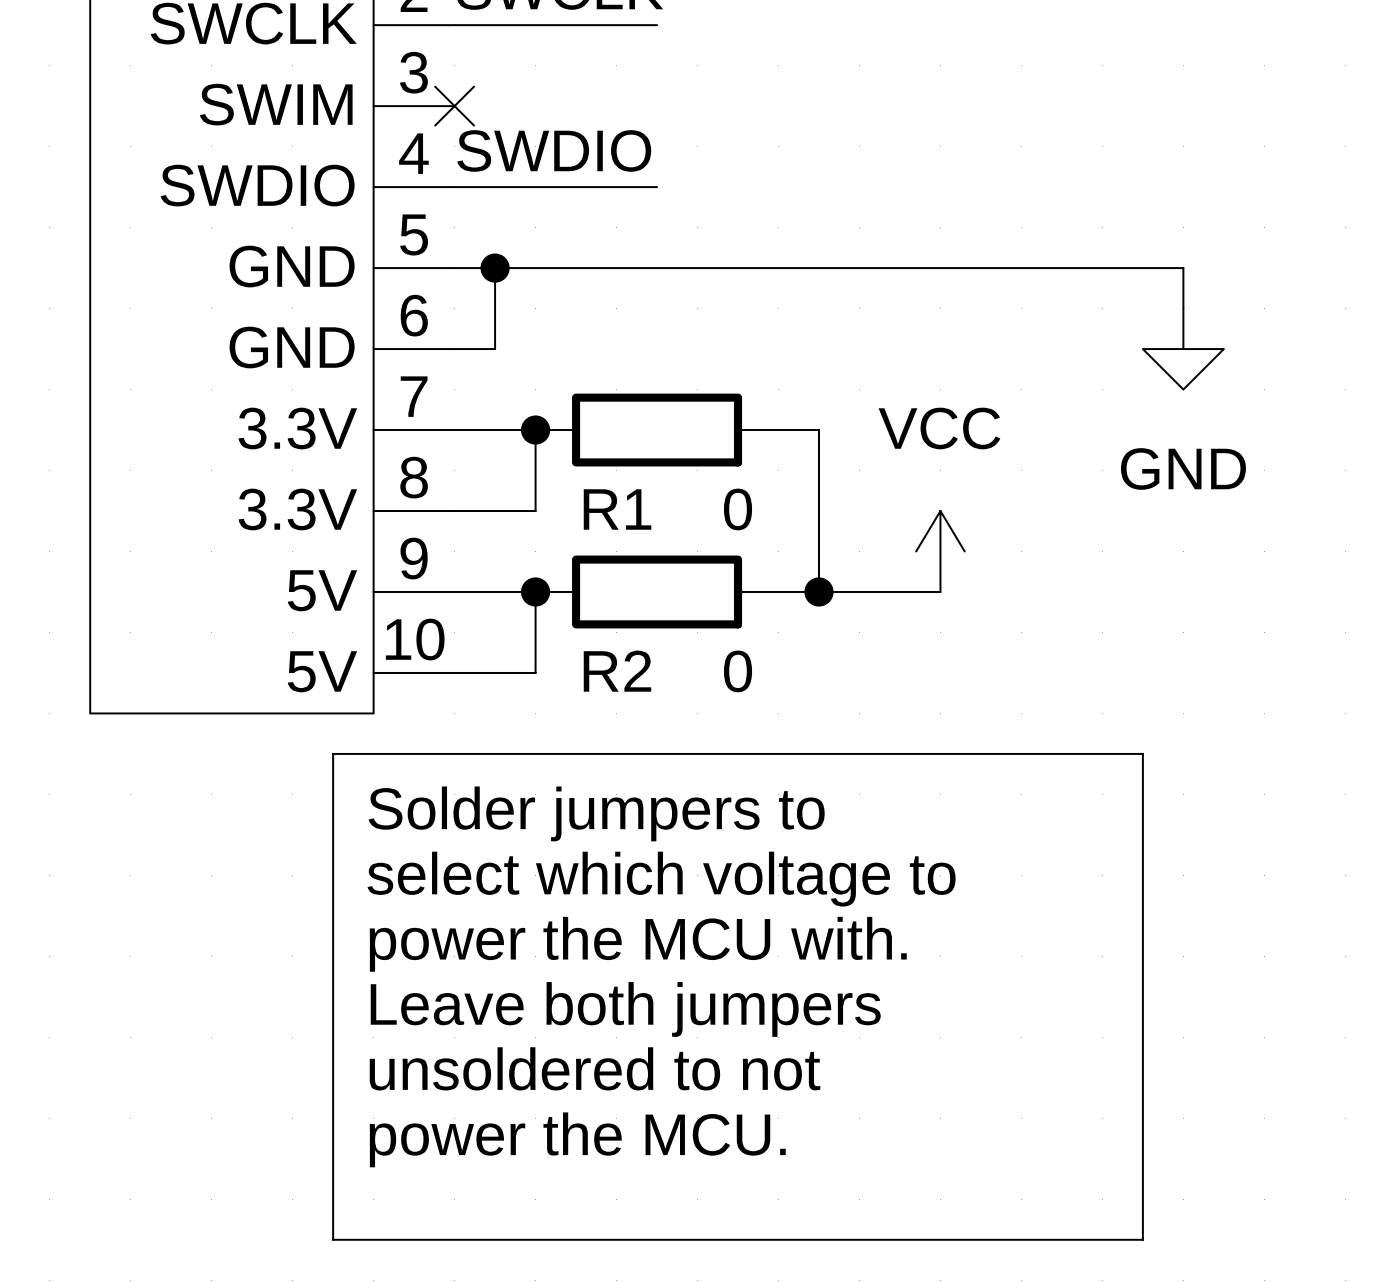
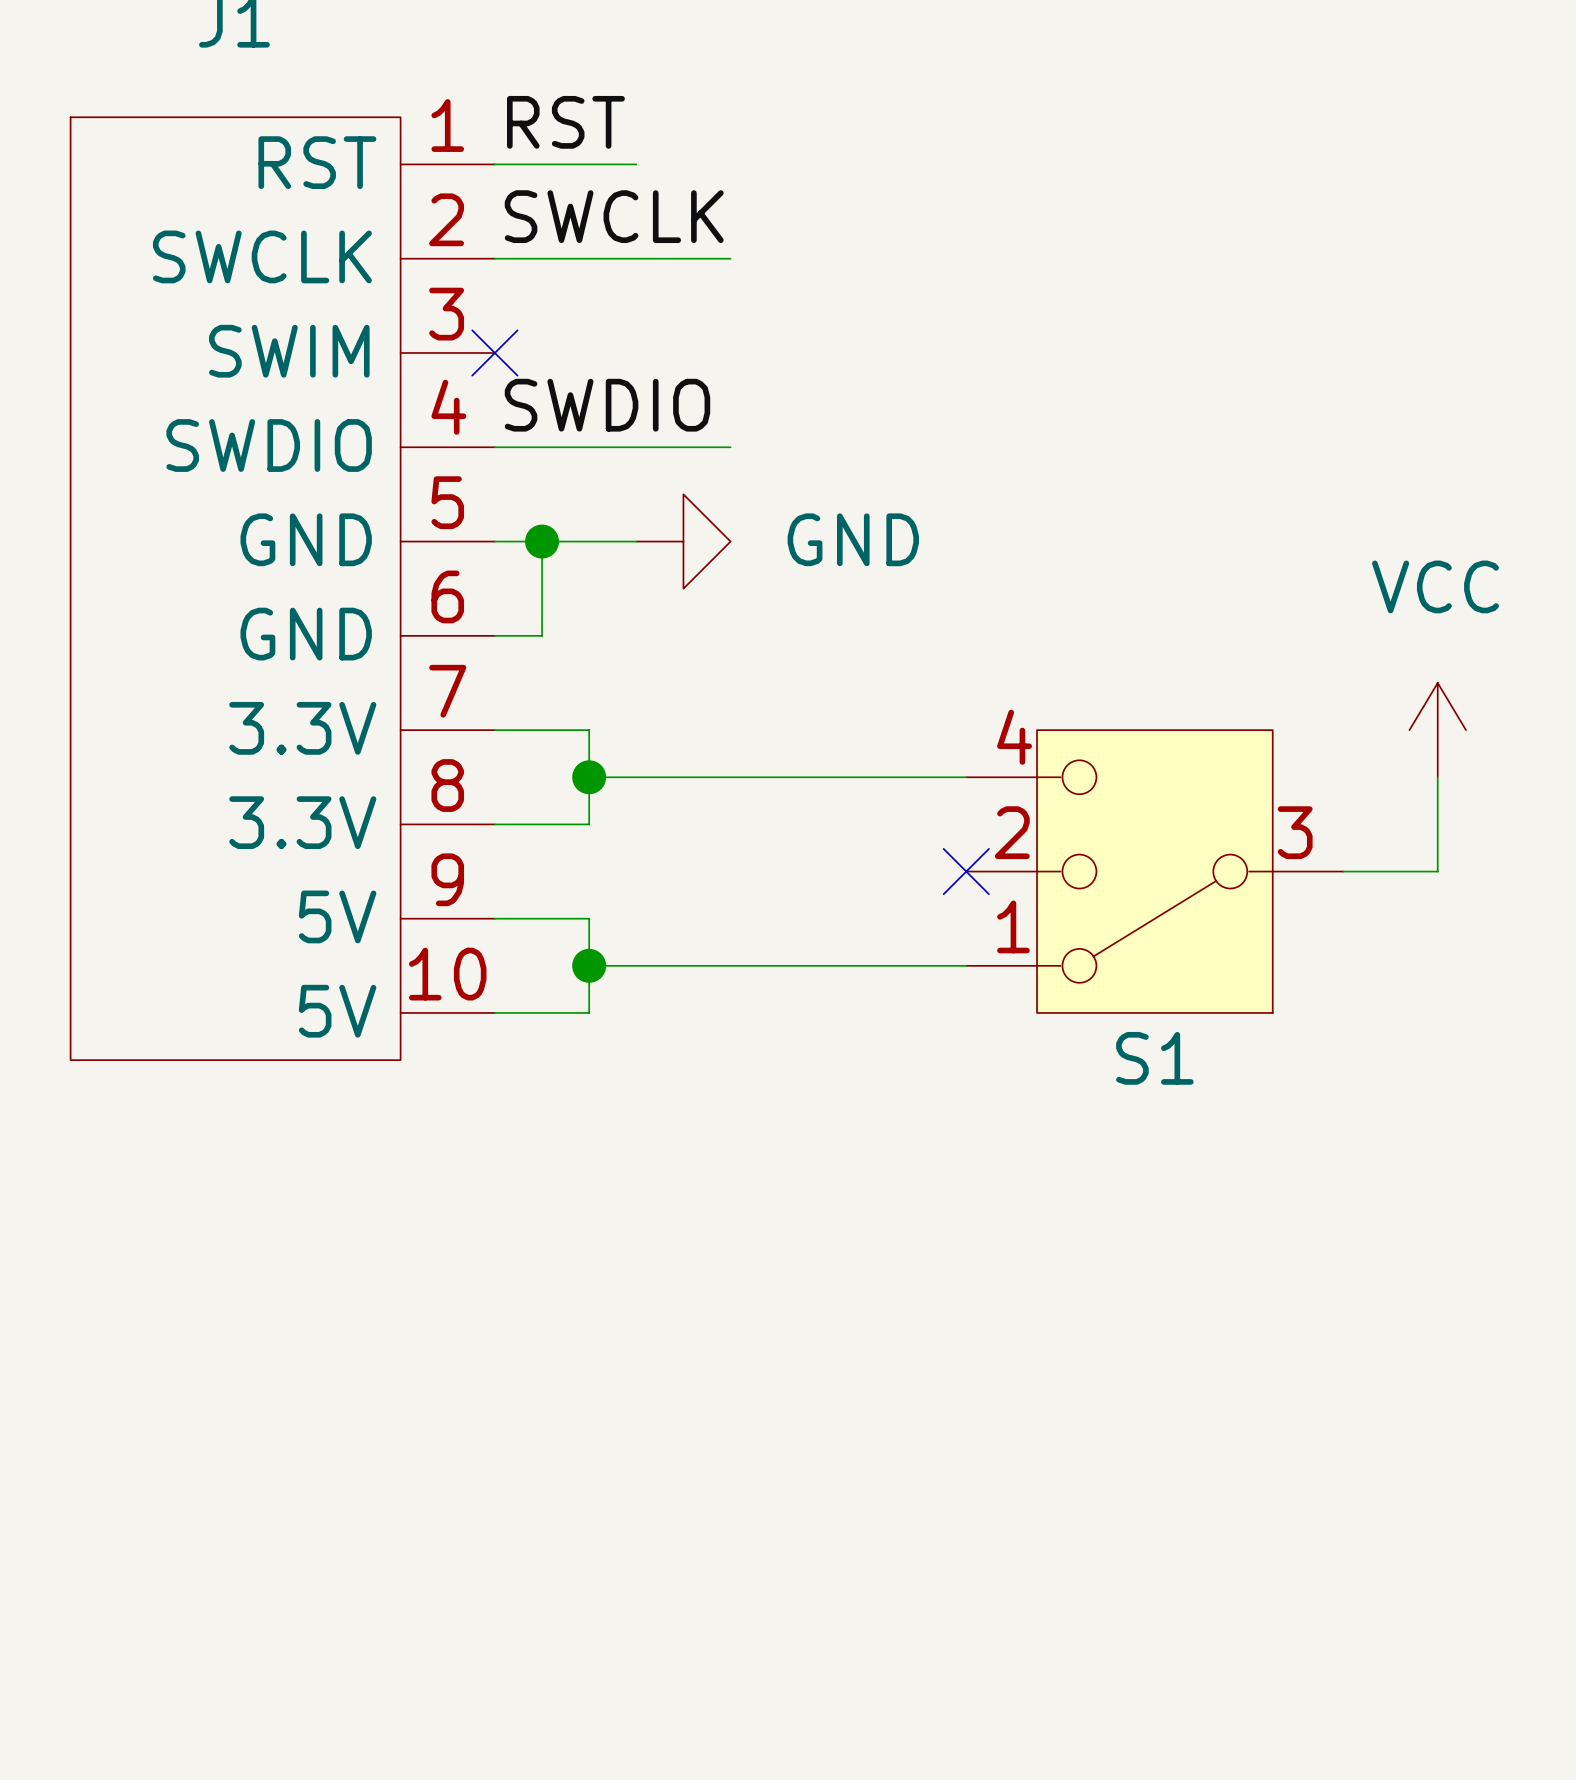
wire: (576, 268) (1183, 268) (1183, 308) -> none
power symbol rotation: 0° (1183, 349) -> 90° counterclockwise (683, 541)
power symbol position: GND (1183, 349) -> GND (683, 541)
junction position: (535, 430) -> (589, 777)
R1: 0 (657, 430) -> none
wire: (778, 430) (818, 430) (818, 591) -> none
wire: none -> (589, 777) (966, 777)
wire: none -> (1437, 777) (1437, 871) (1343, 871)
no-connect mark: none -> (966, 871)
power symbol position: VCC (940, 551) -> VCC (1437, 730)
S1: none -> (1154, 871)
junction position: (535, 591) -> (589, 965)
R2: 0 (657, 591) -> none
wire: (778, 591) (940, 591) -> none
junction: (818, 591) -> none
wire: none -> (589, 965) (966, 965)
line: (333, 753) (1142, 753) (1142, 1239) (333, 1239) (333, 753) -> none
text: Solder jumpers to (596, 813) -> none
text: select which voltage to (661, 879) -> none
text: power the MCU with. (638, 944) -> none
text: Leave both jumpers (625, 1009) -> none
text: unsoldered to not (595, 1068) -> none
text: power the MCU. (577, 1139) -> none

